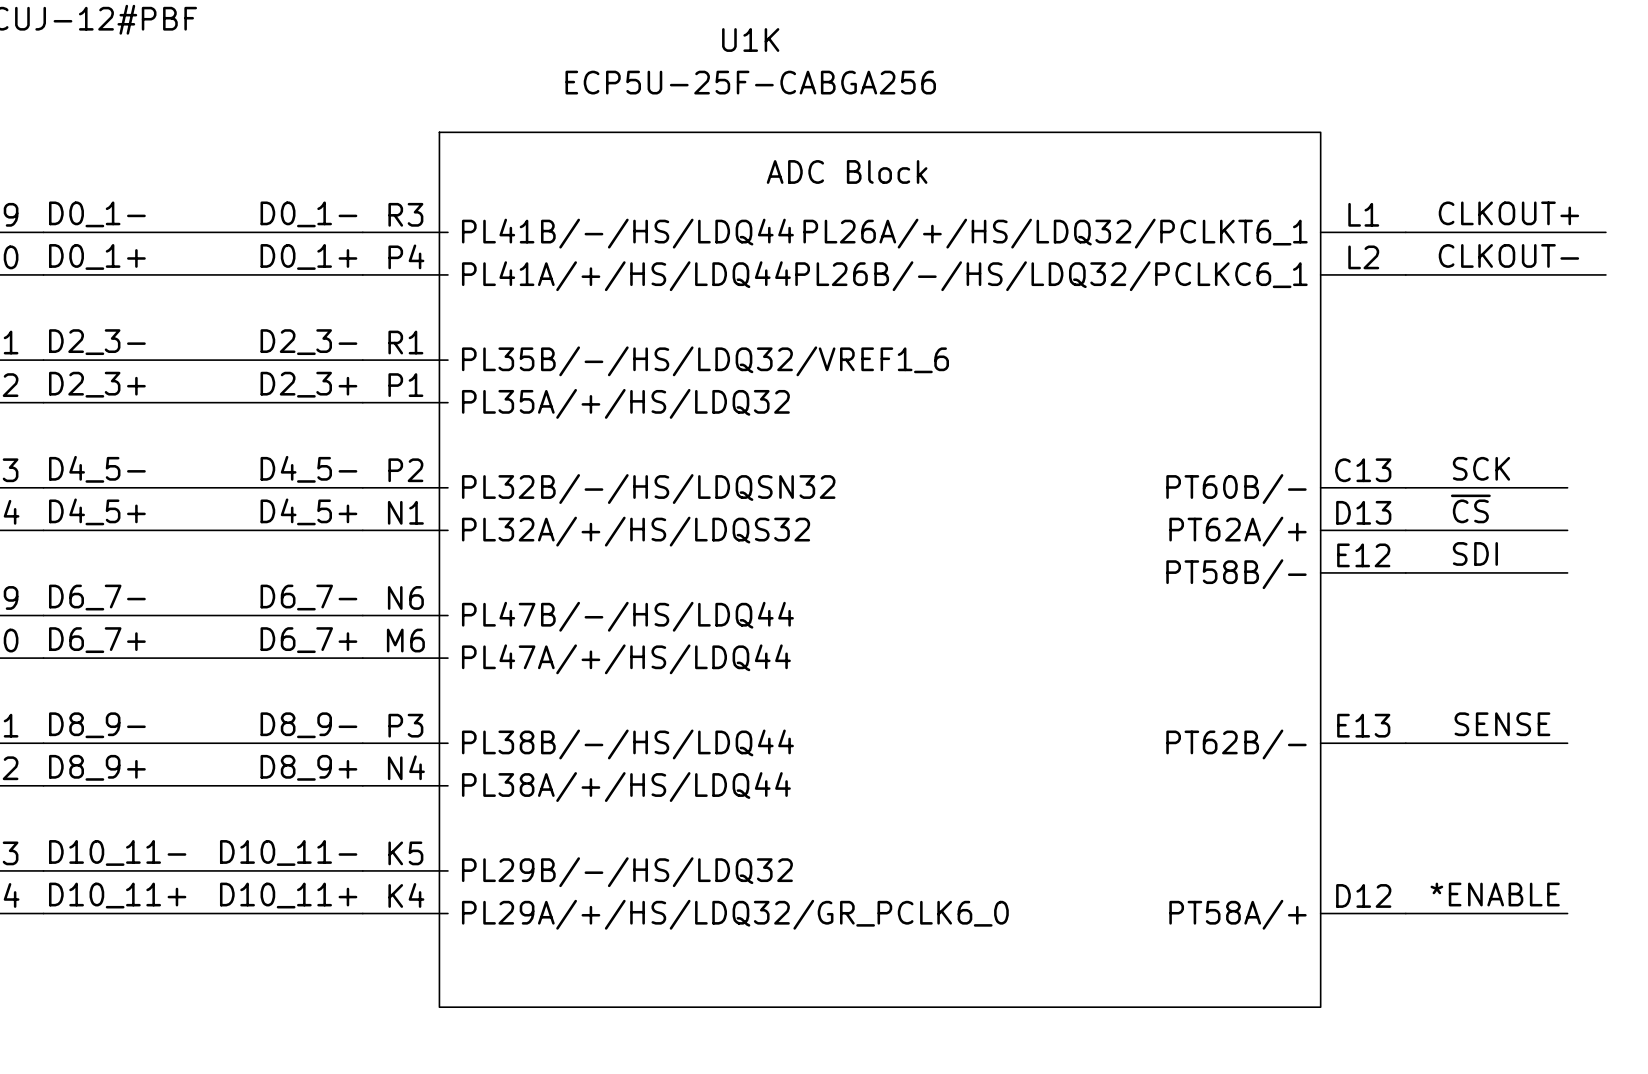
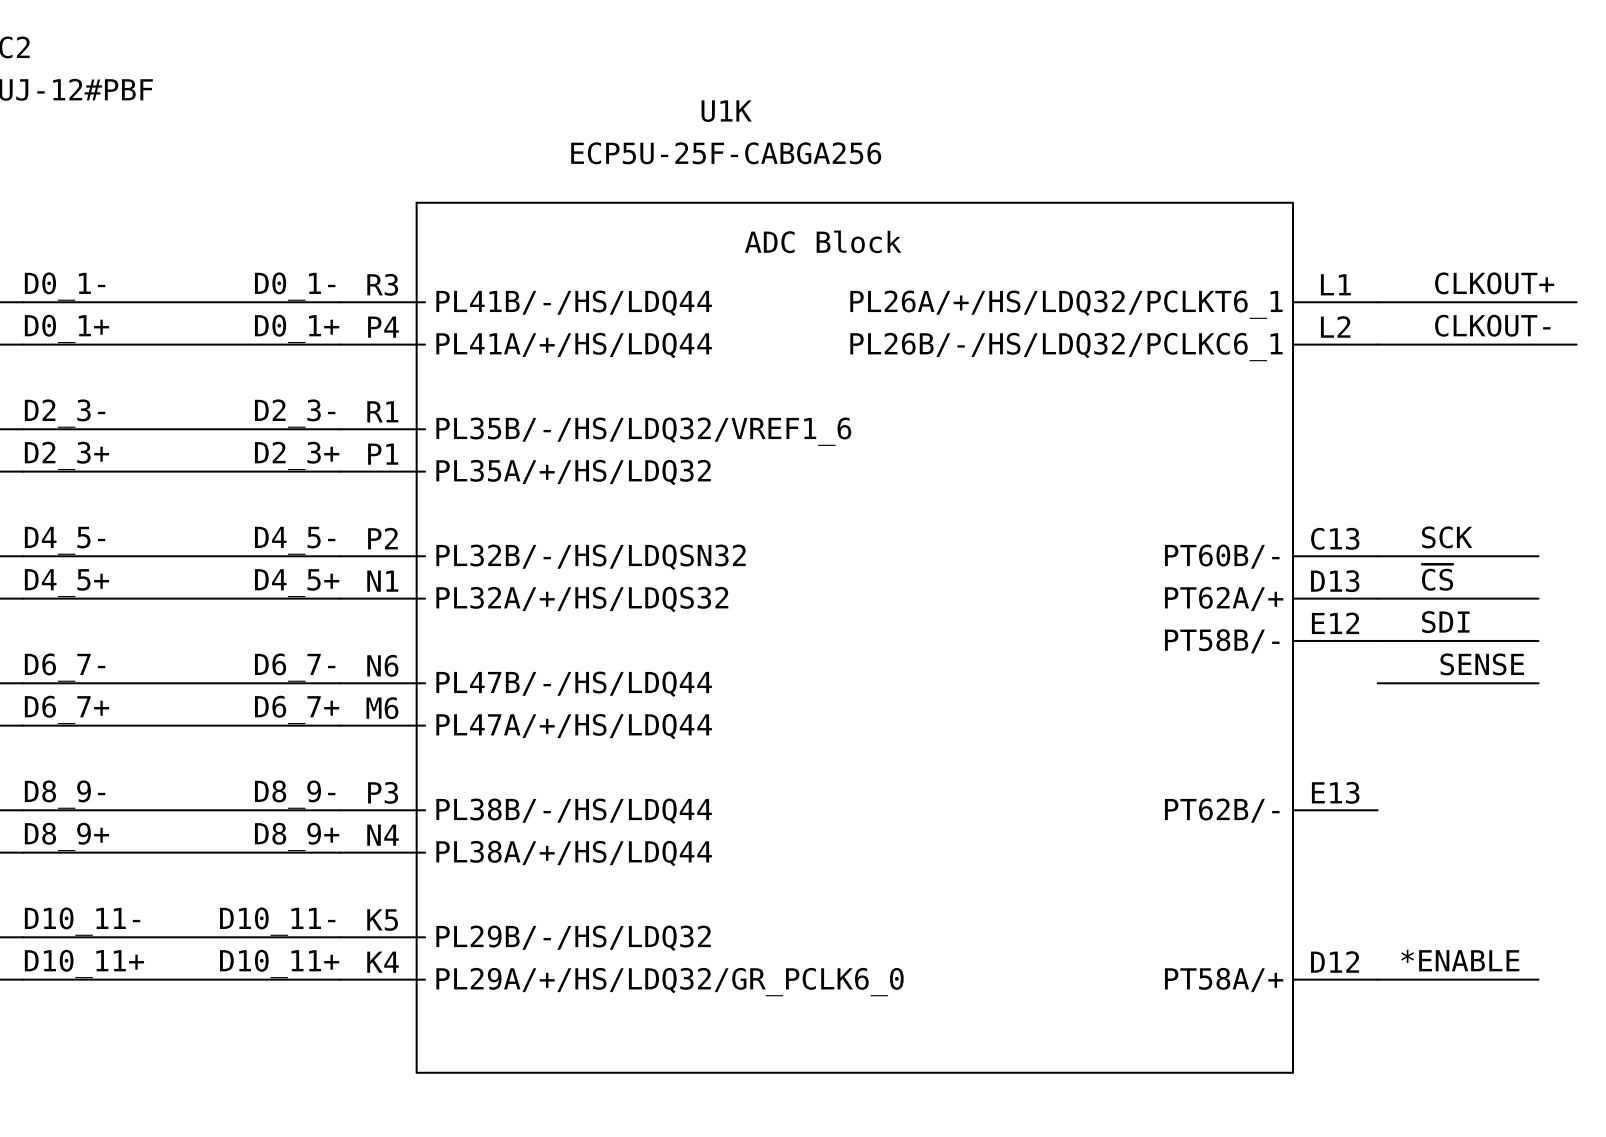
label position: SENSE (1502, 724) -> SENSE (1482, 664)
wire: (1405, 743) (1567, 743) -> (1377, 683) (1538, 683)

